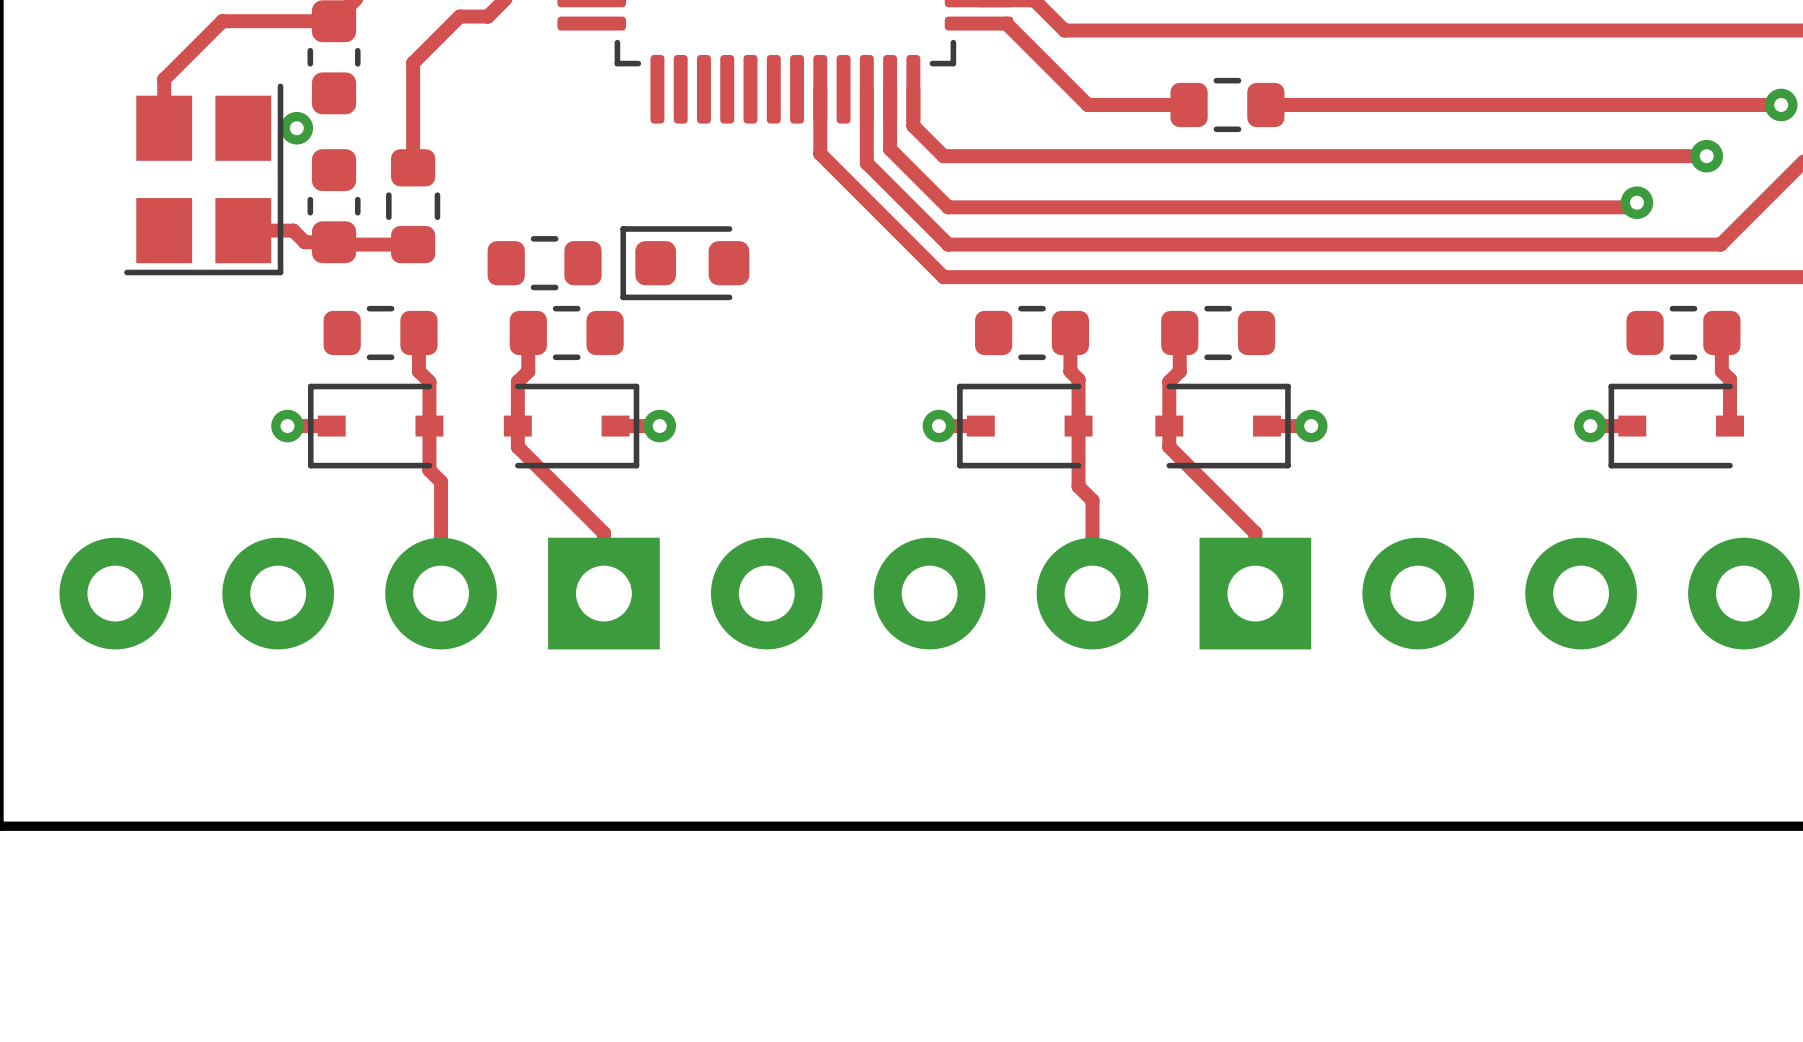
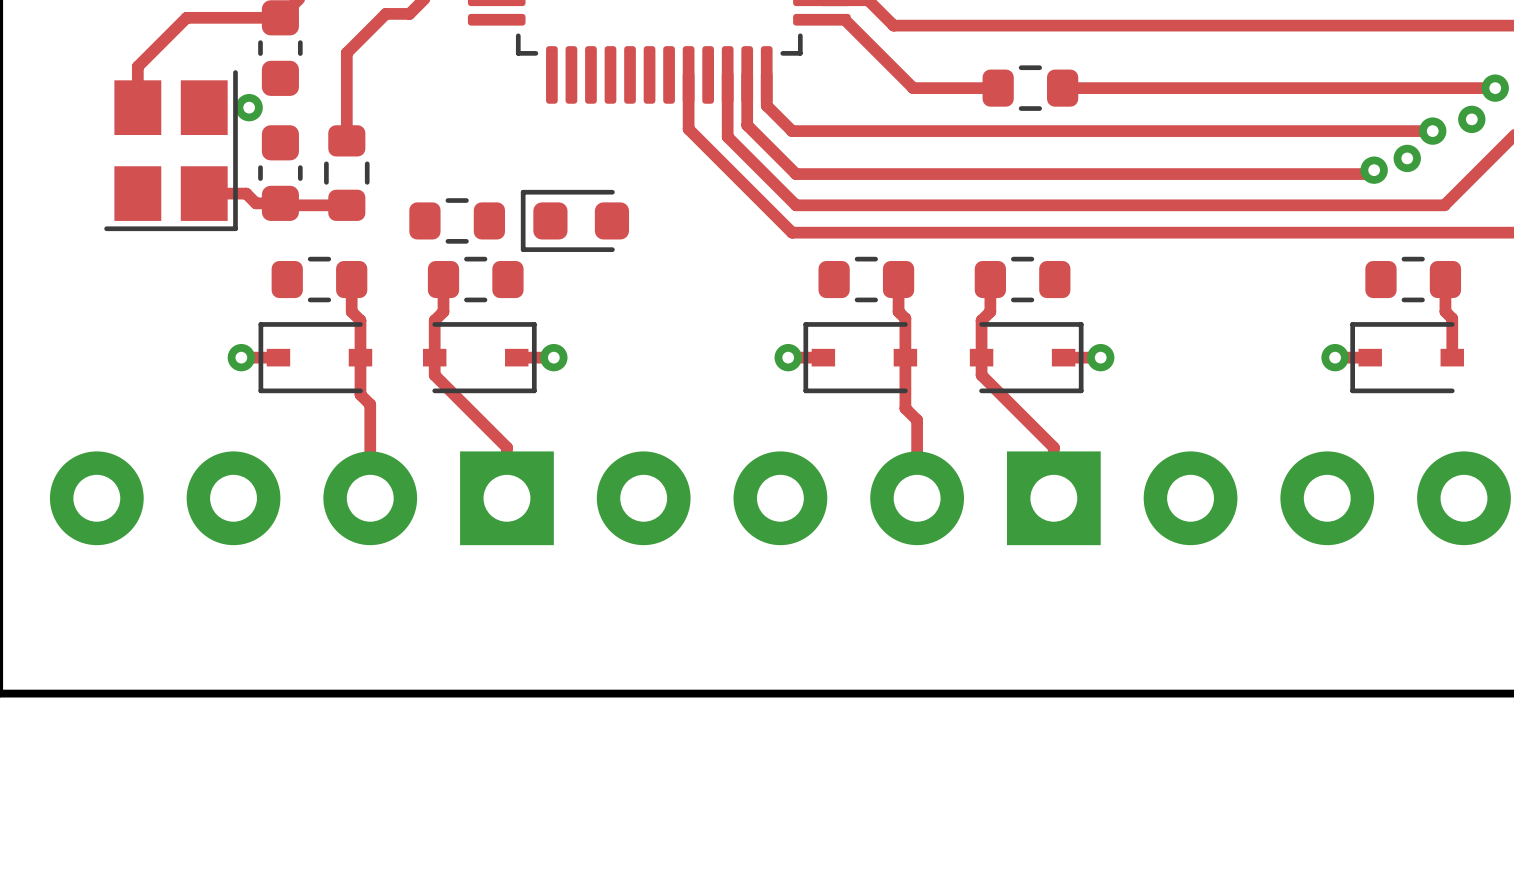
via: none -> (1471, 119)
via: none -> (1407, 158)

